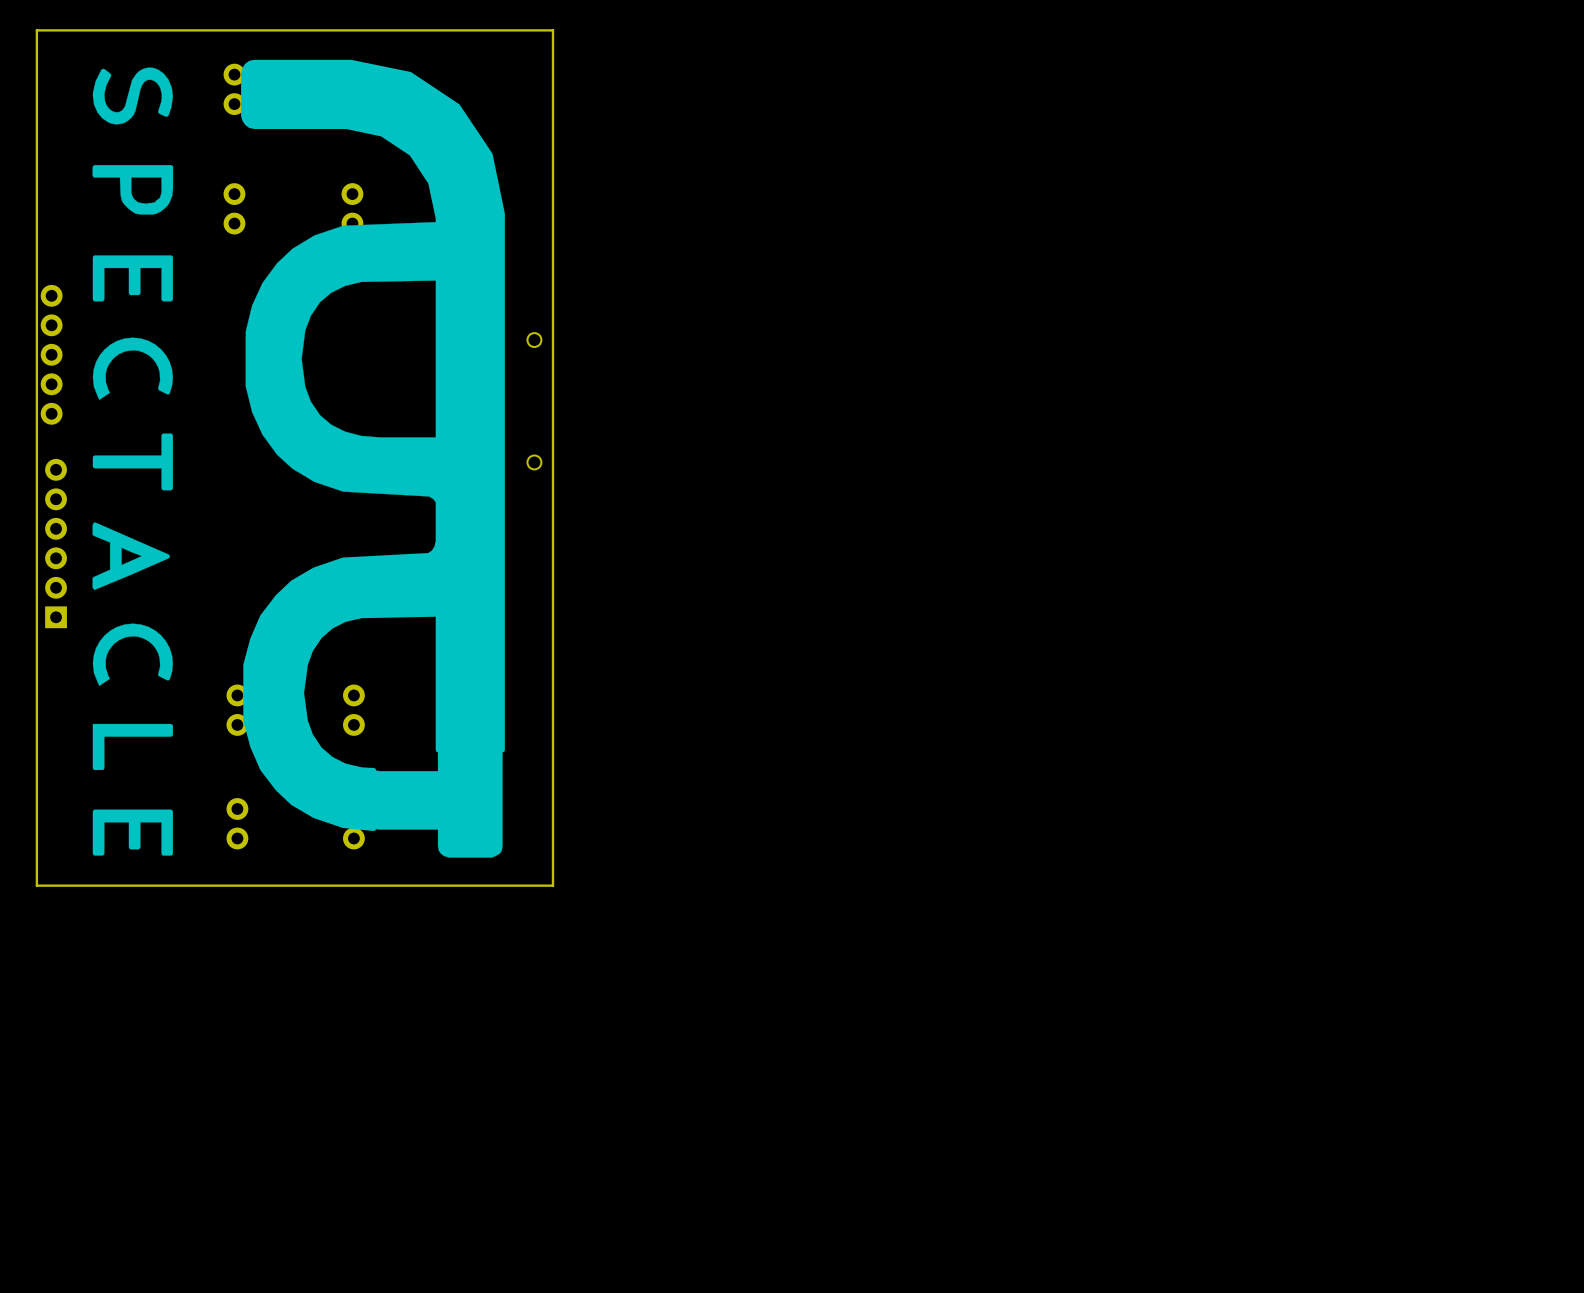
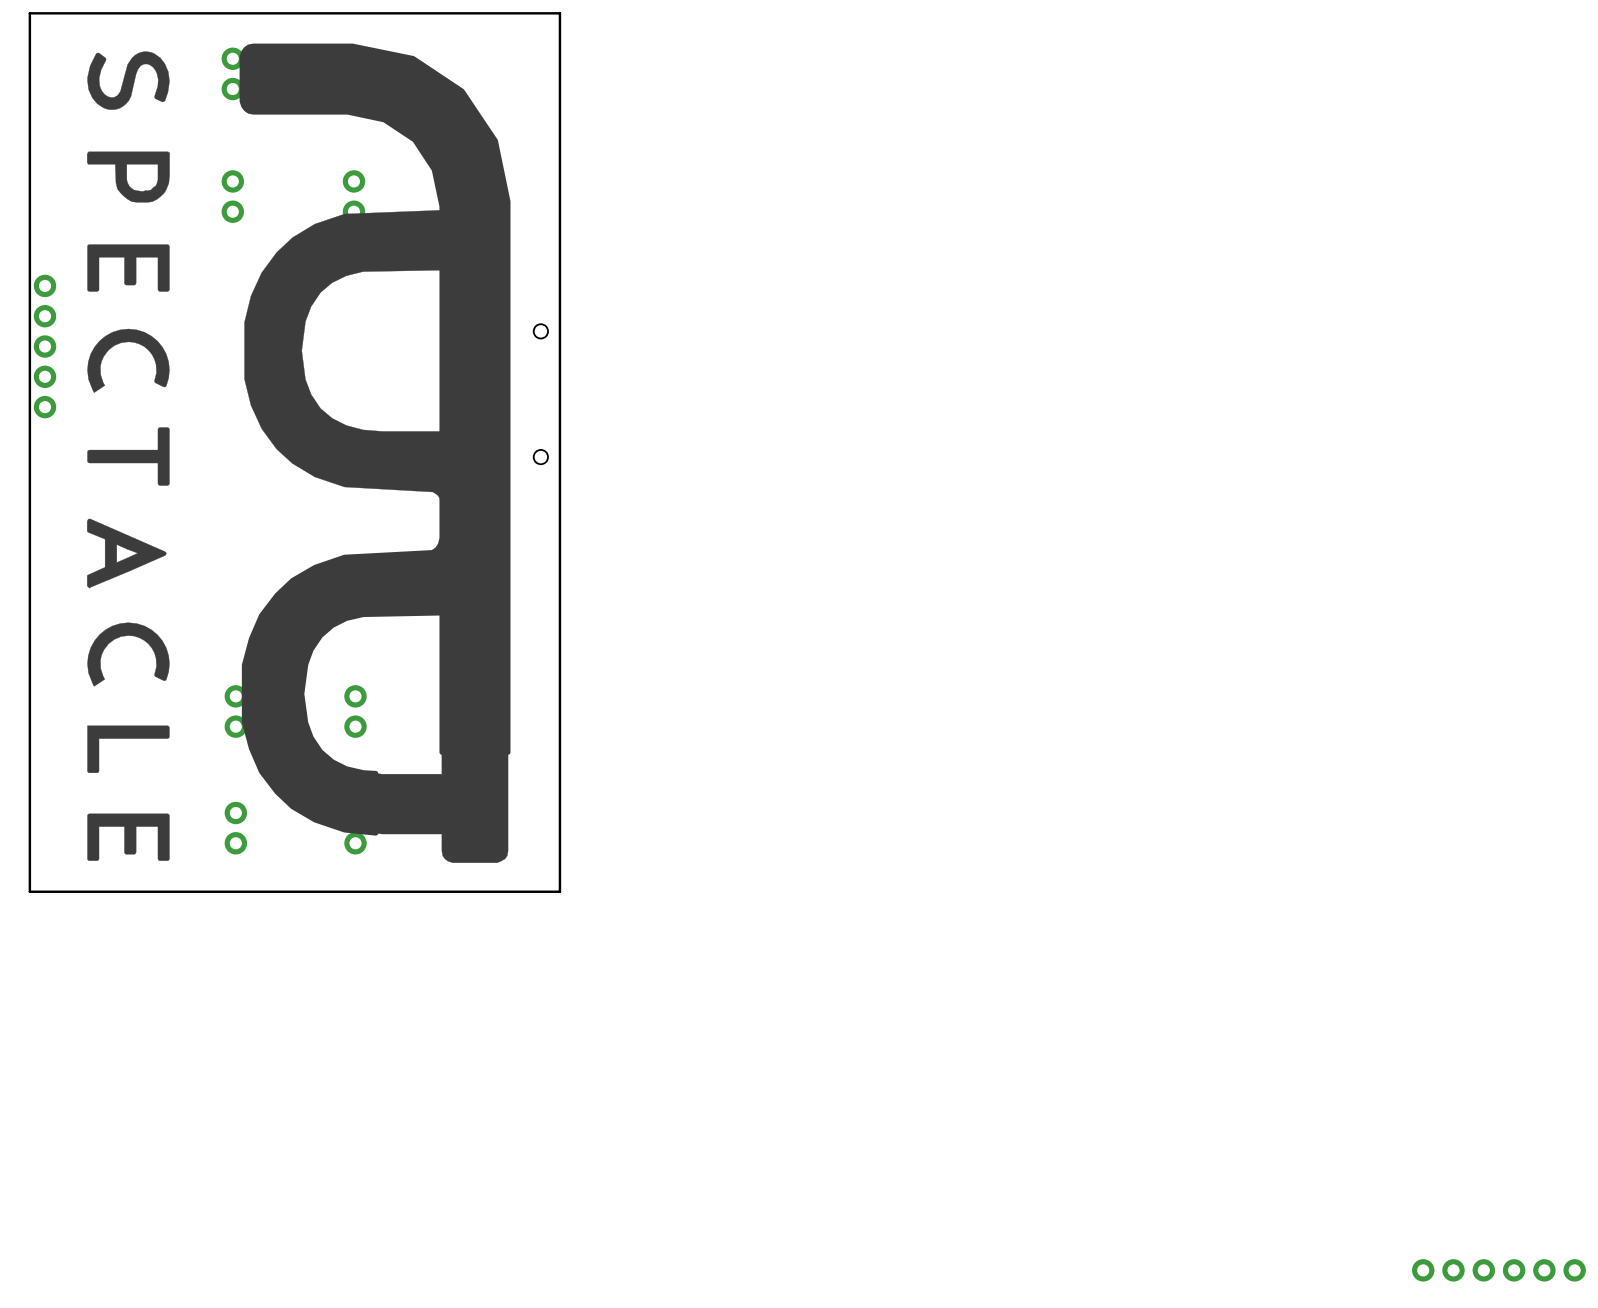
part: (56, 543) -> none
part: none -> (1498, 1270)

